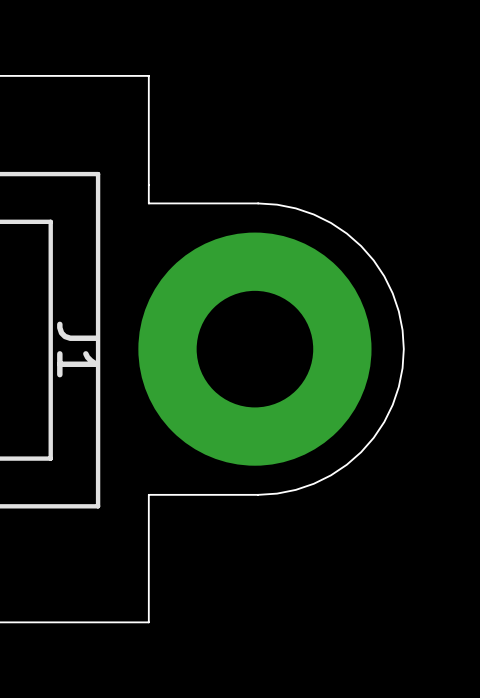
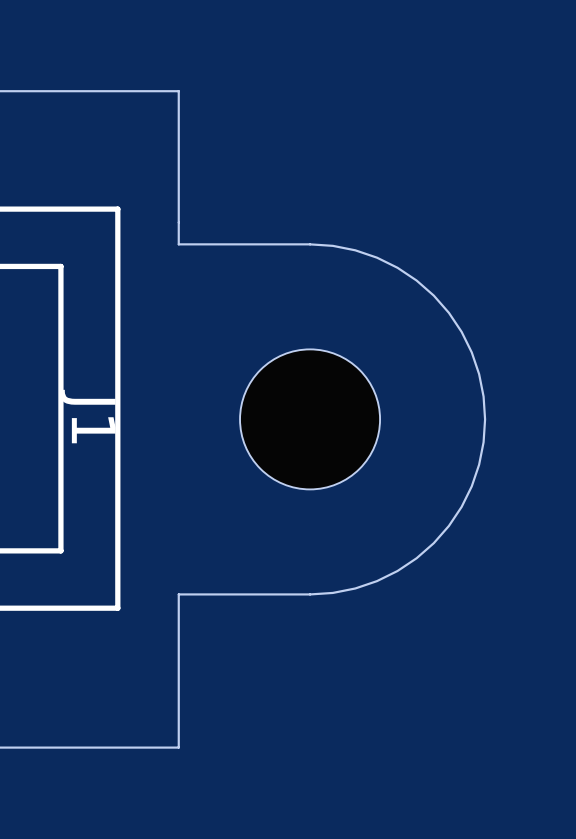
part footprint: [138, 232, 372, 466] -> [240, 349, 381, 490]

